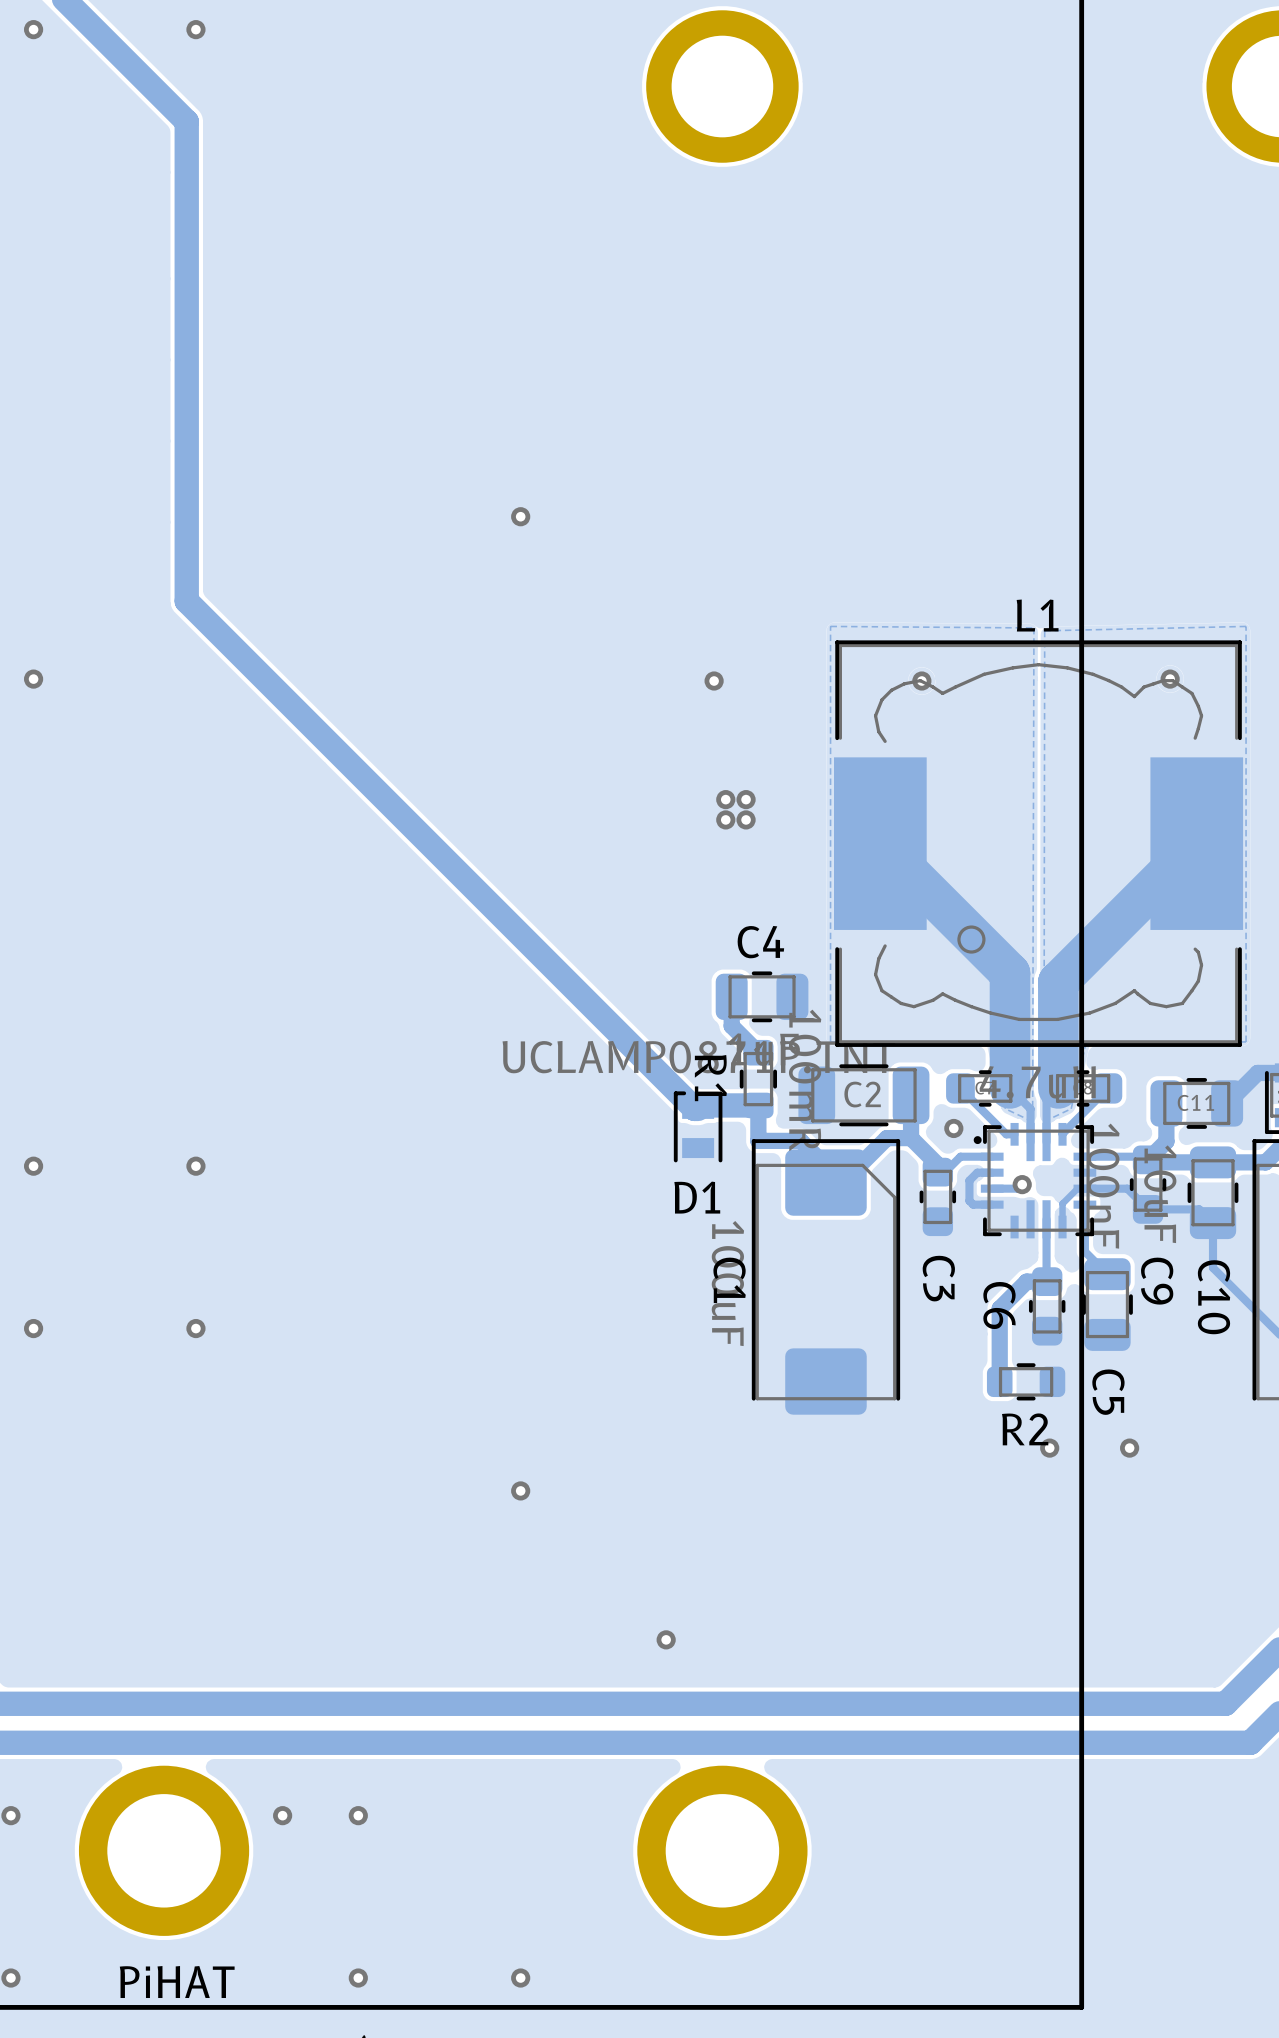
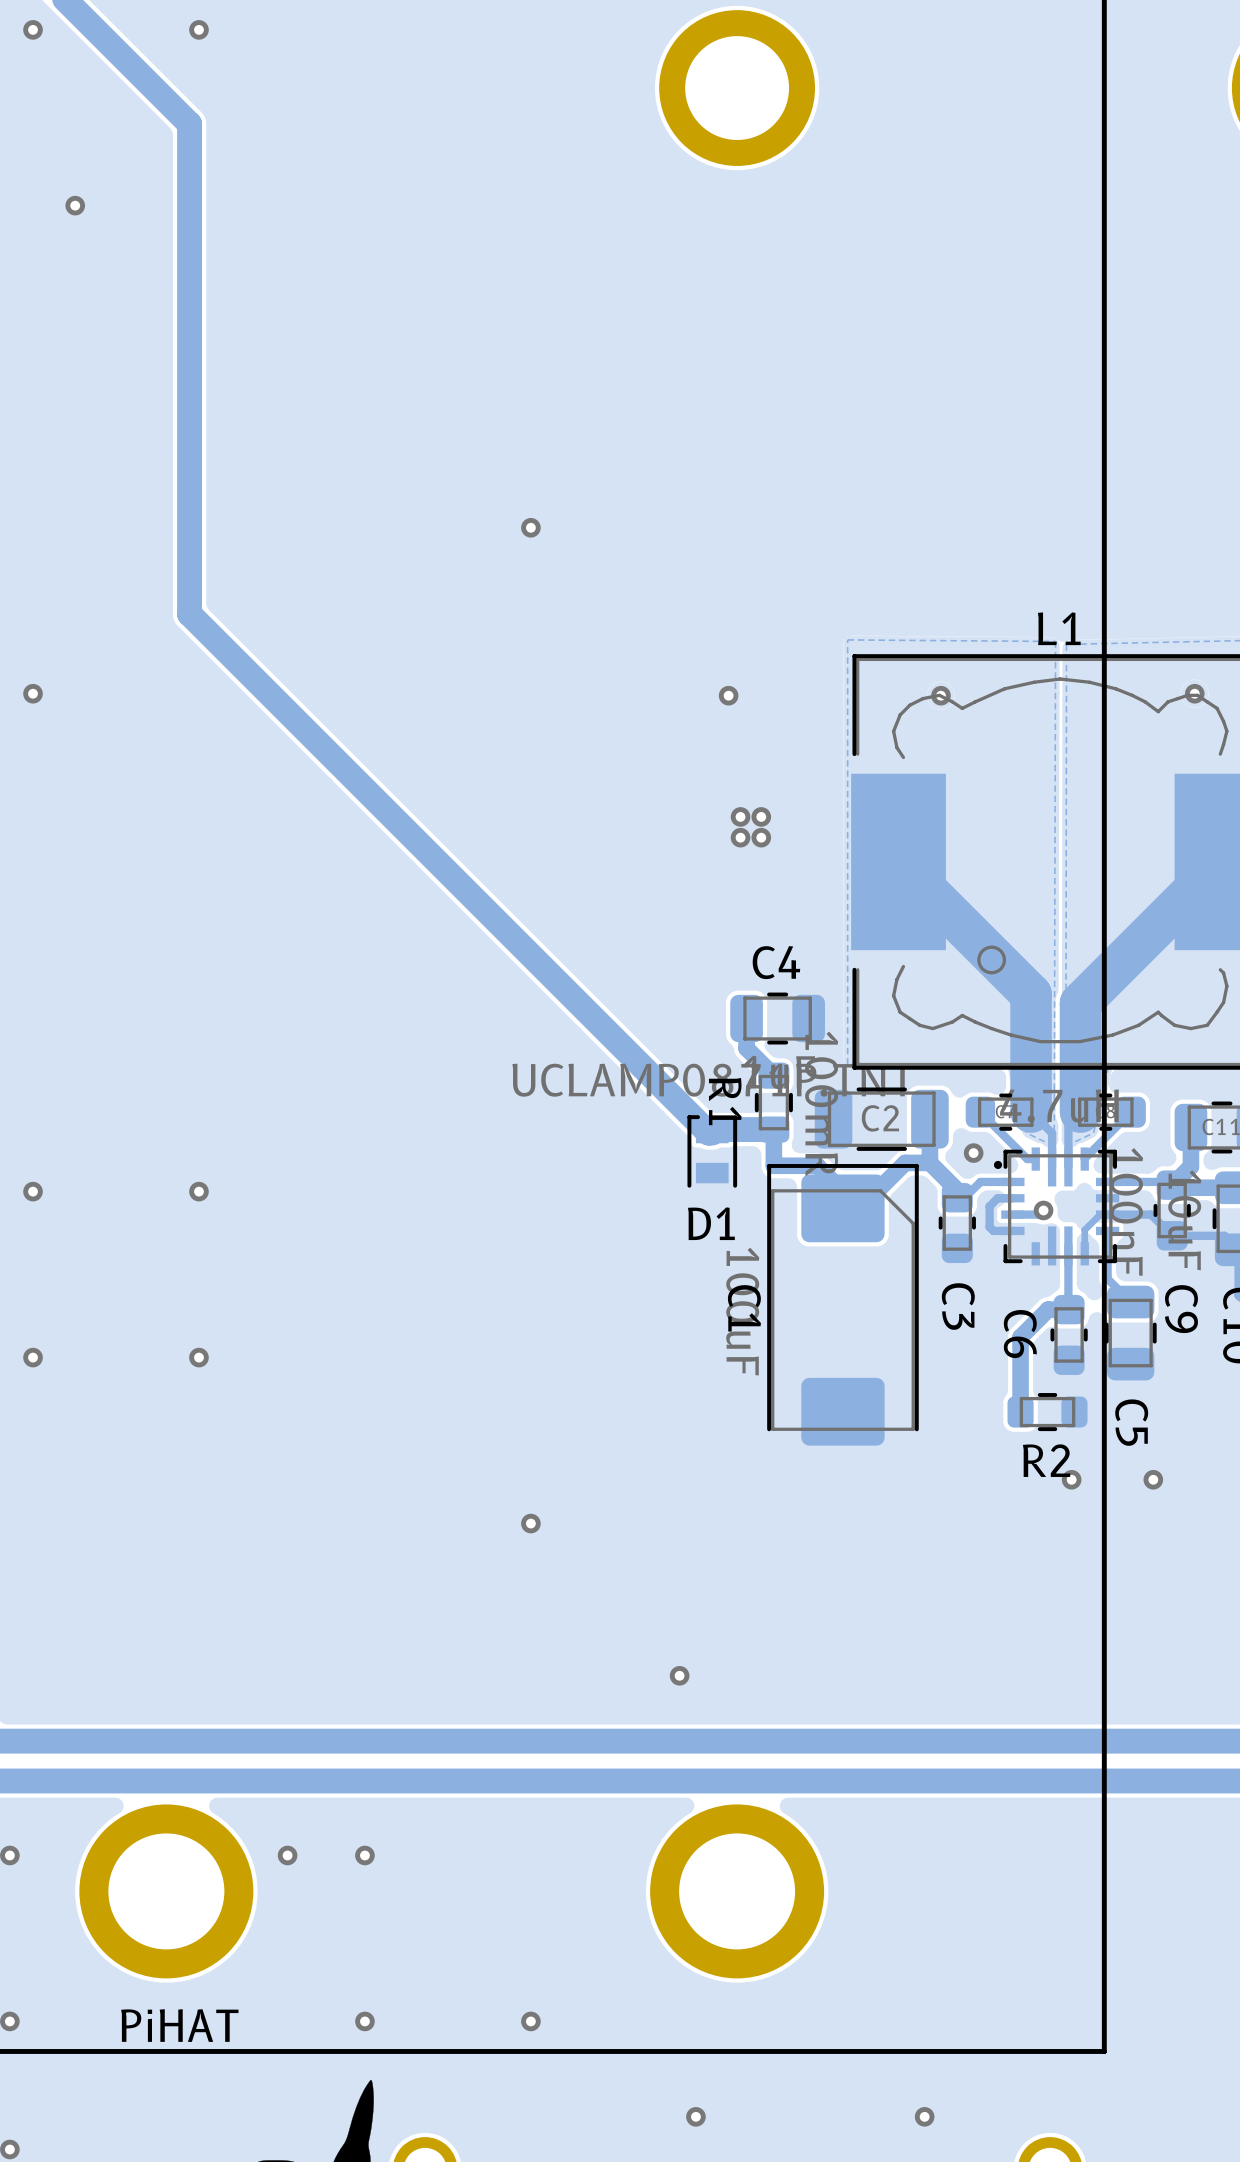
via: none -> (75, 205)

